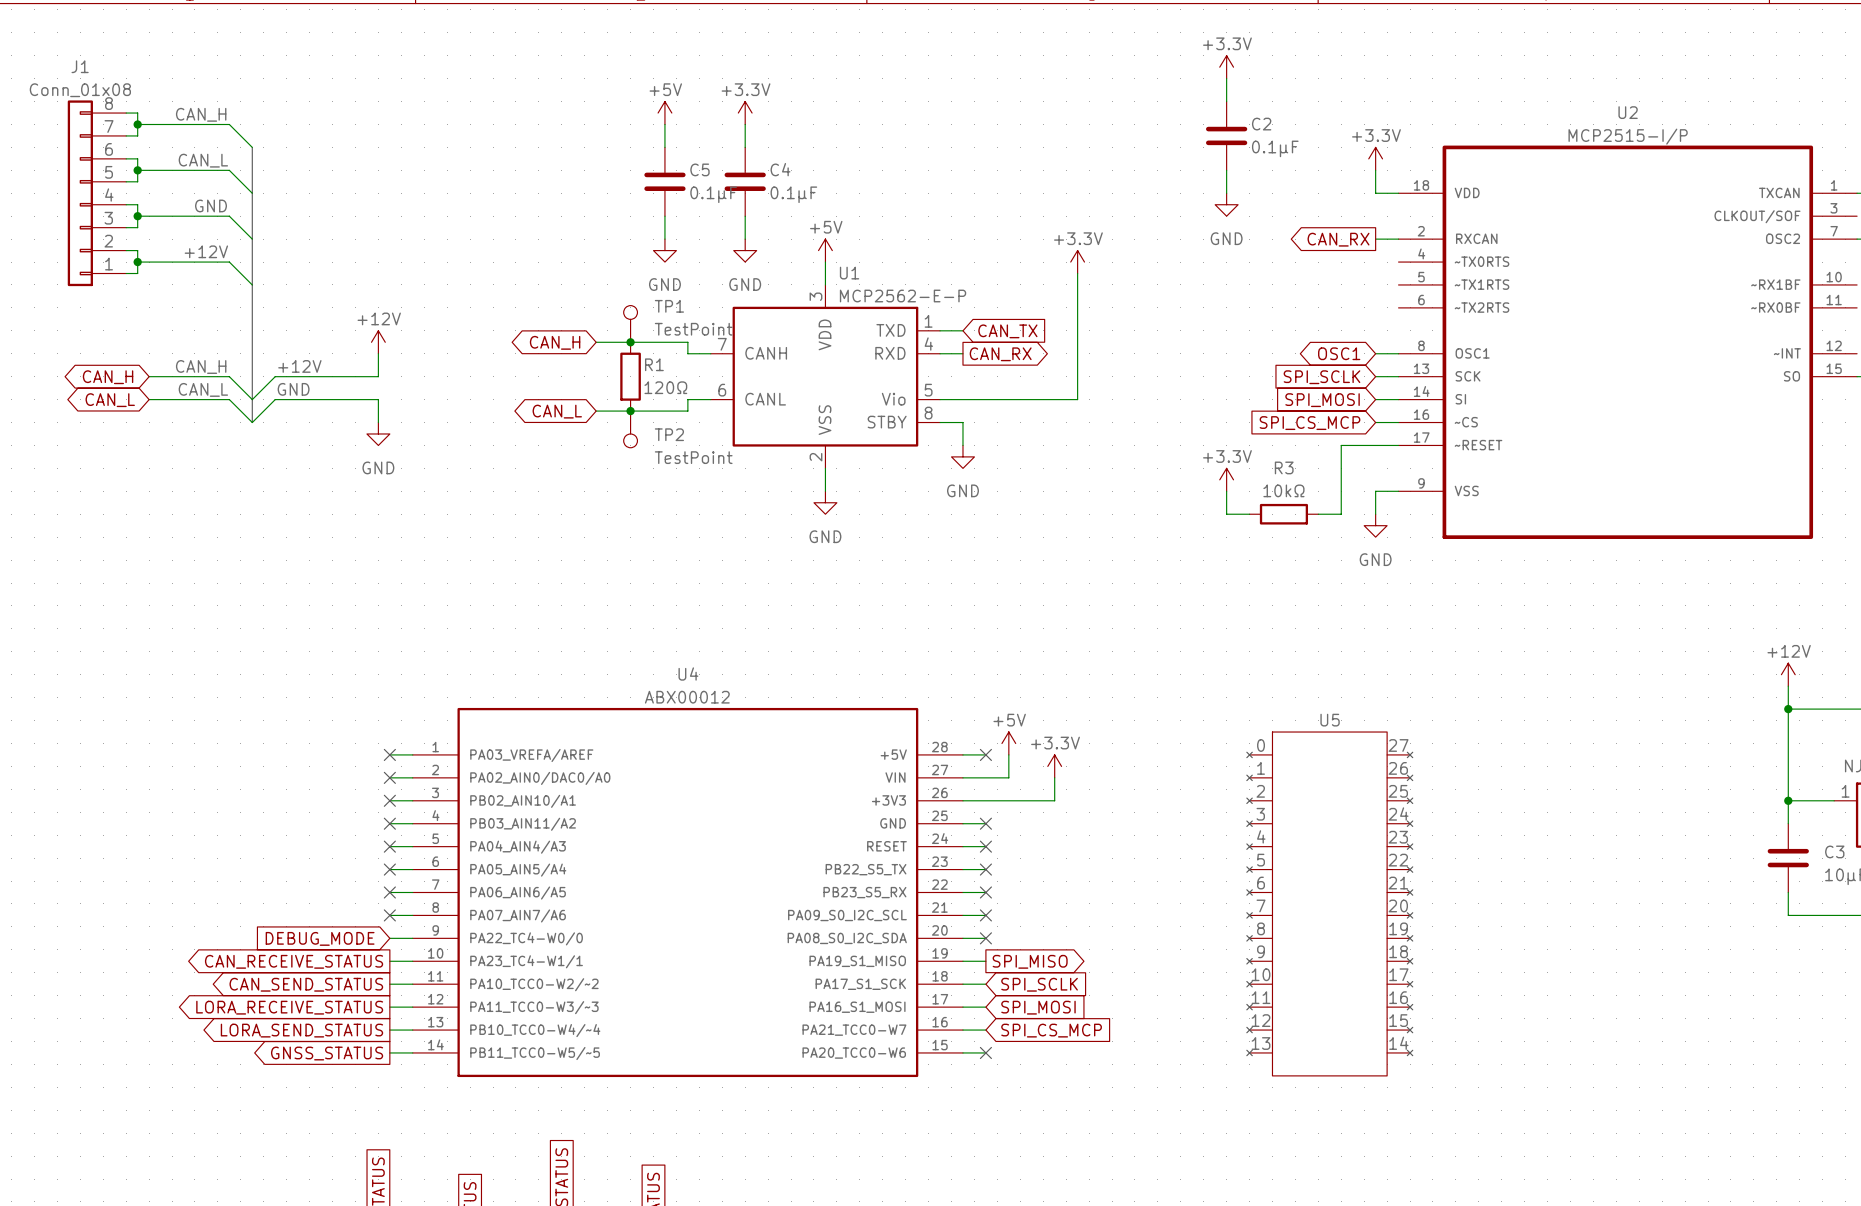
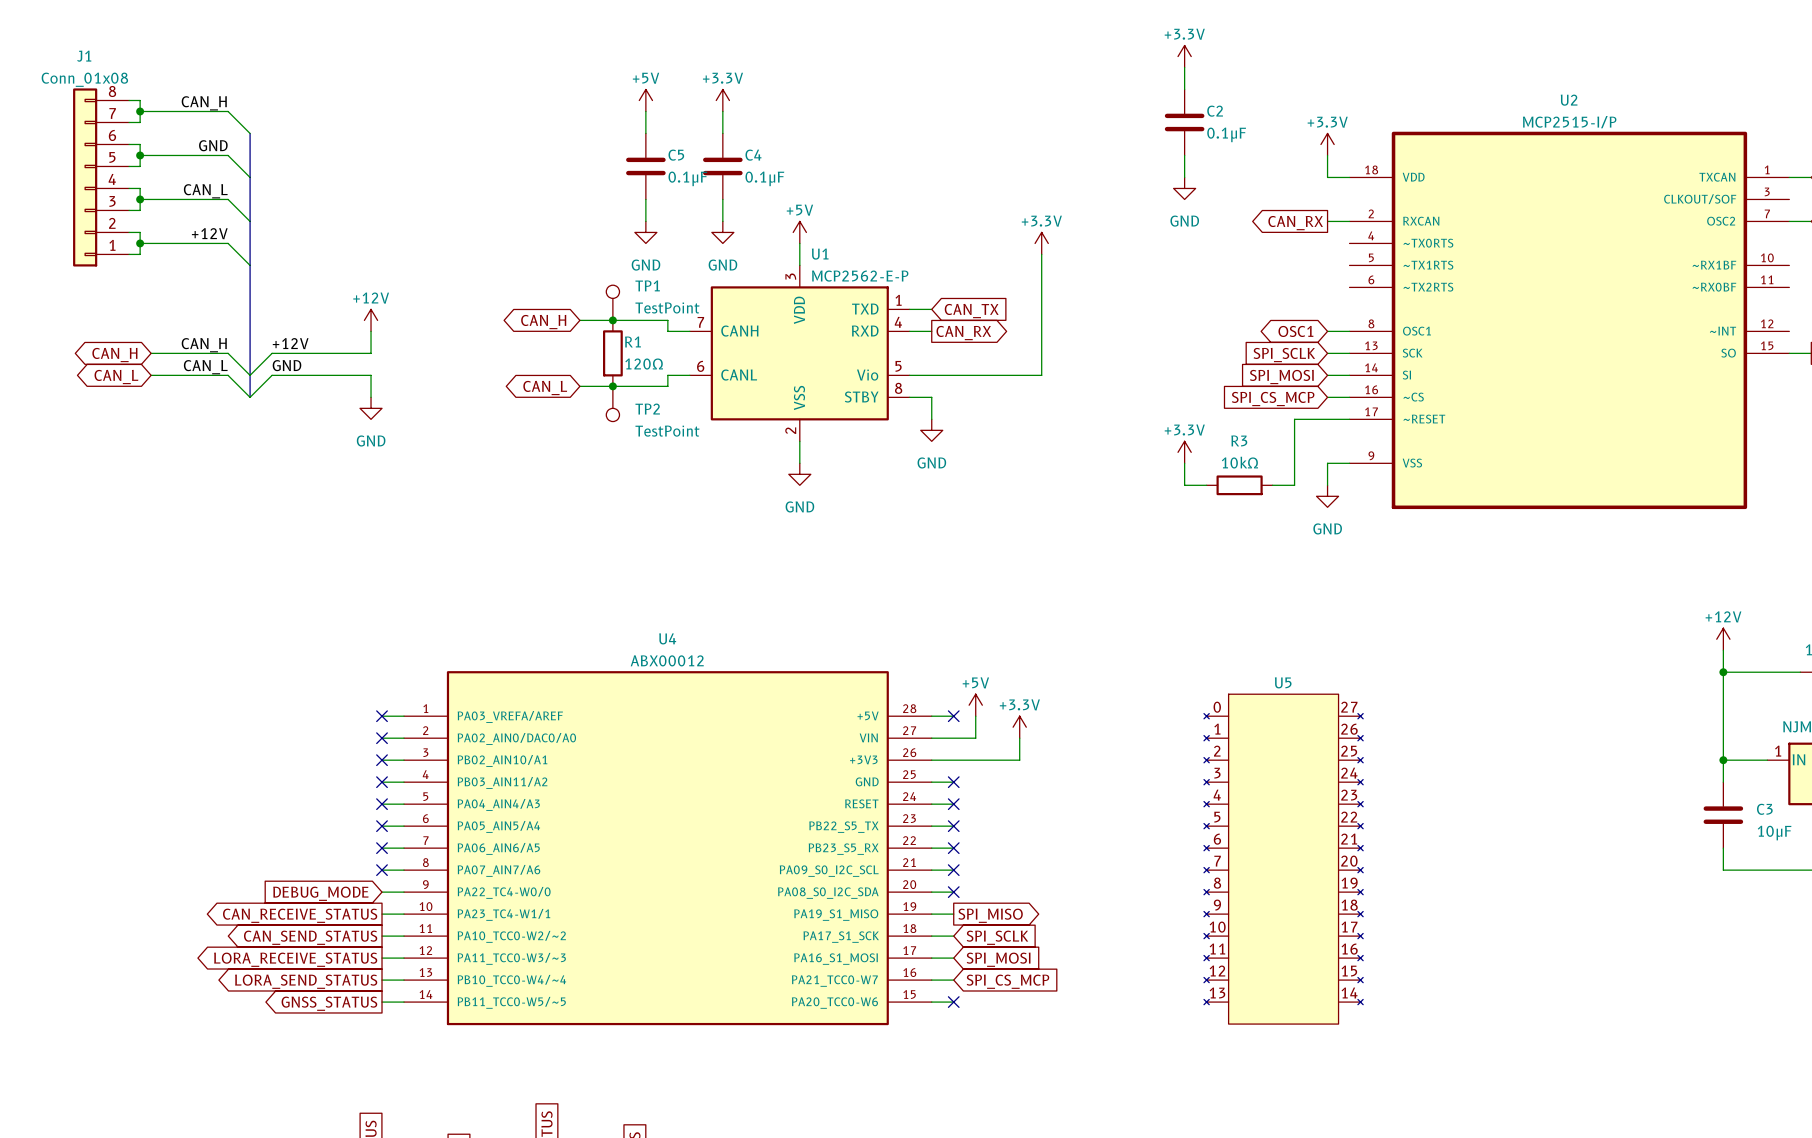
label: CAN_L (203, 160) -> GND (213, 145)
label: GND (211, 205) -> CAN_L (205, 191)

